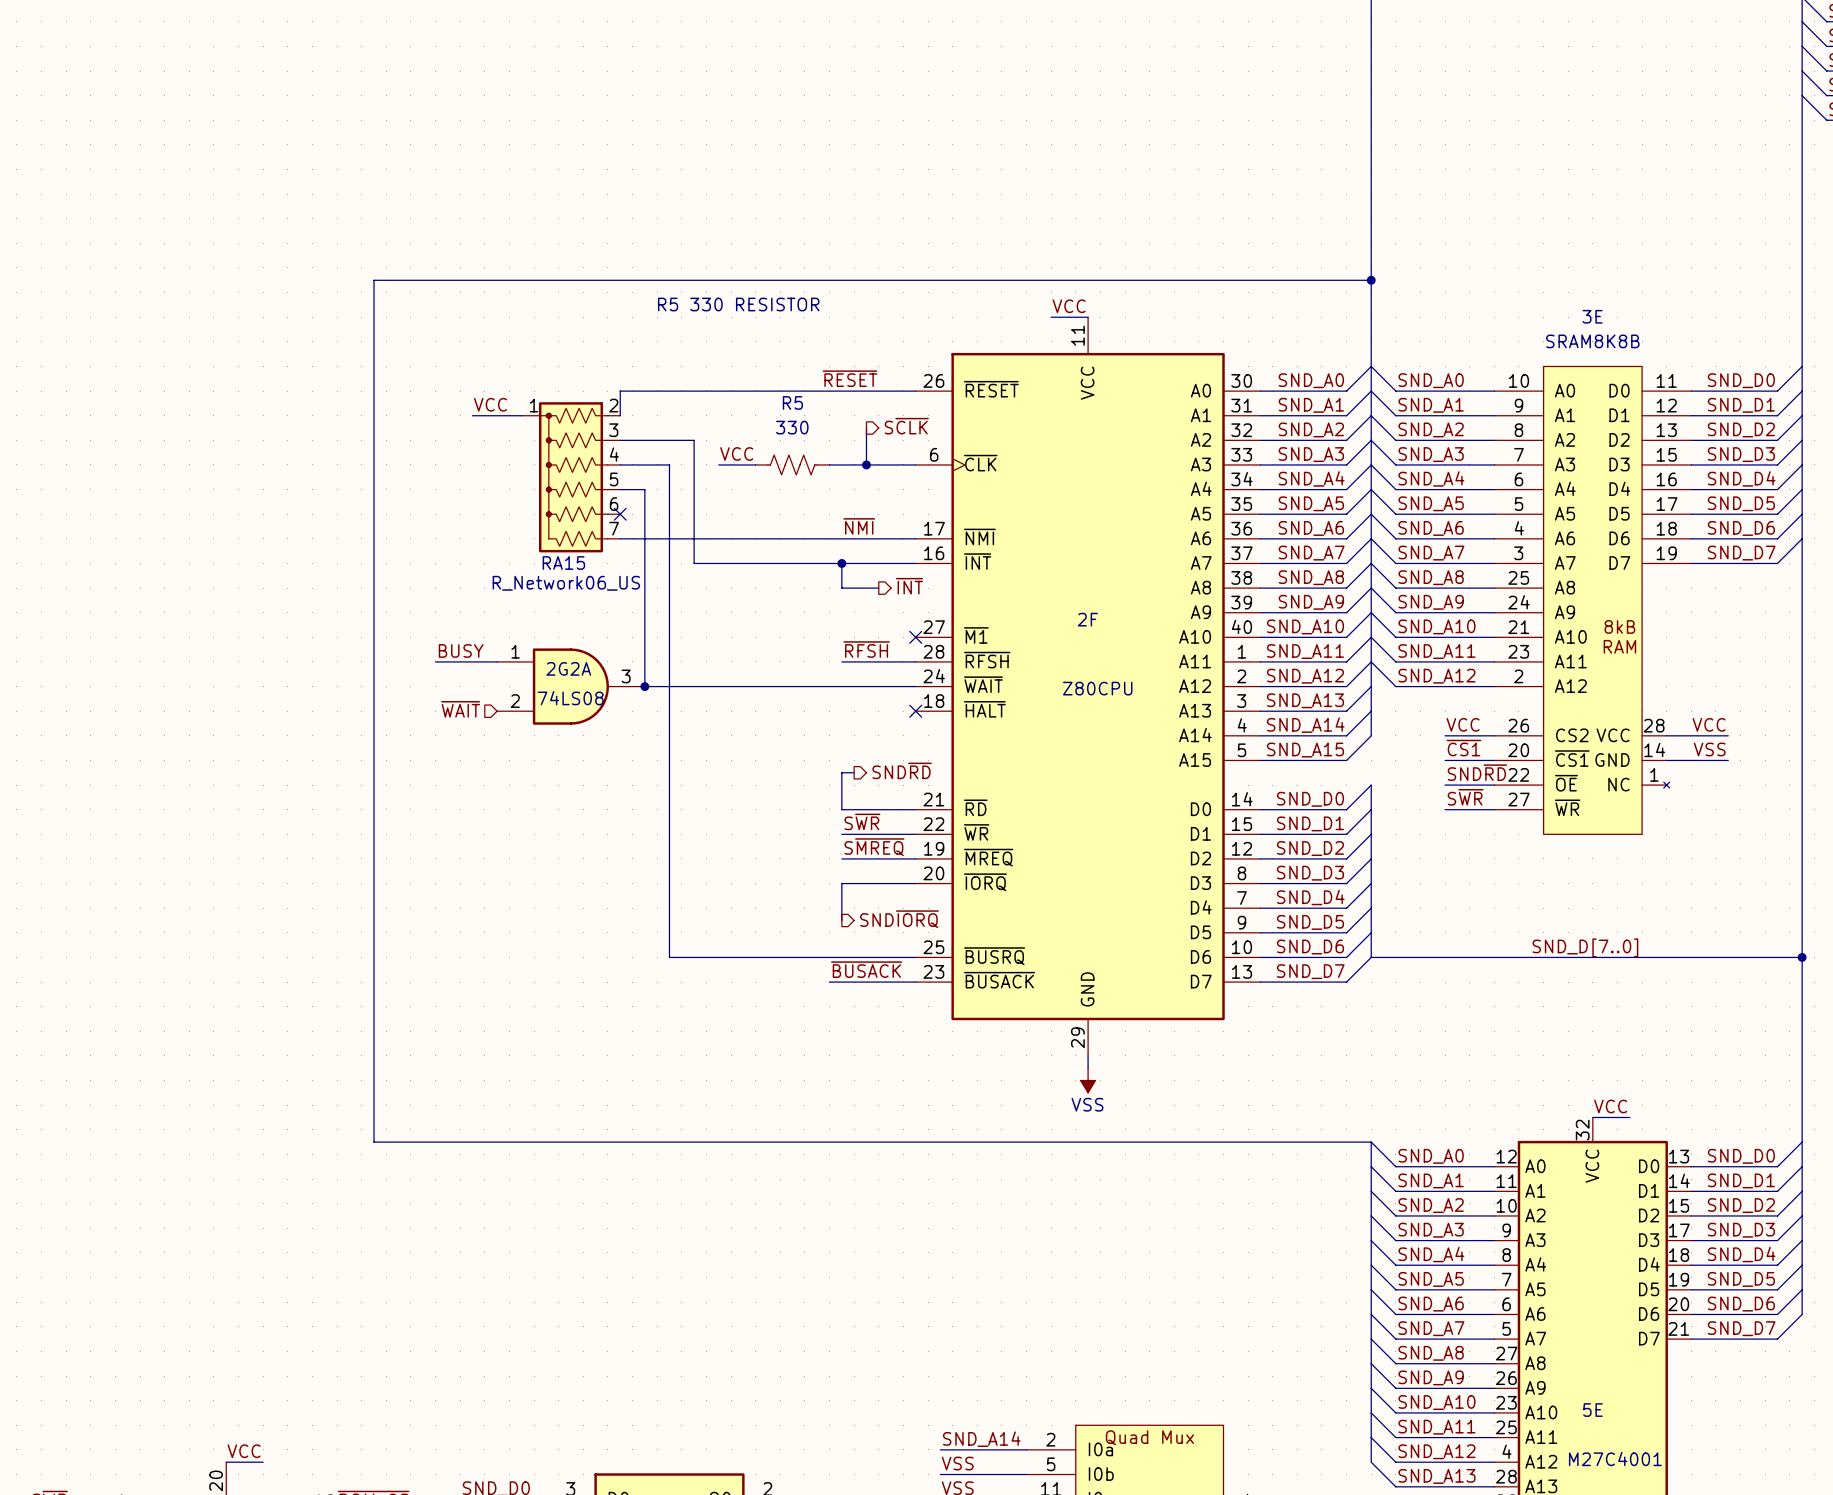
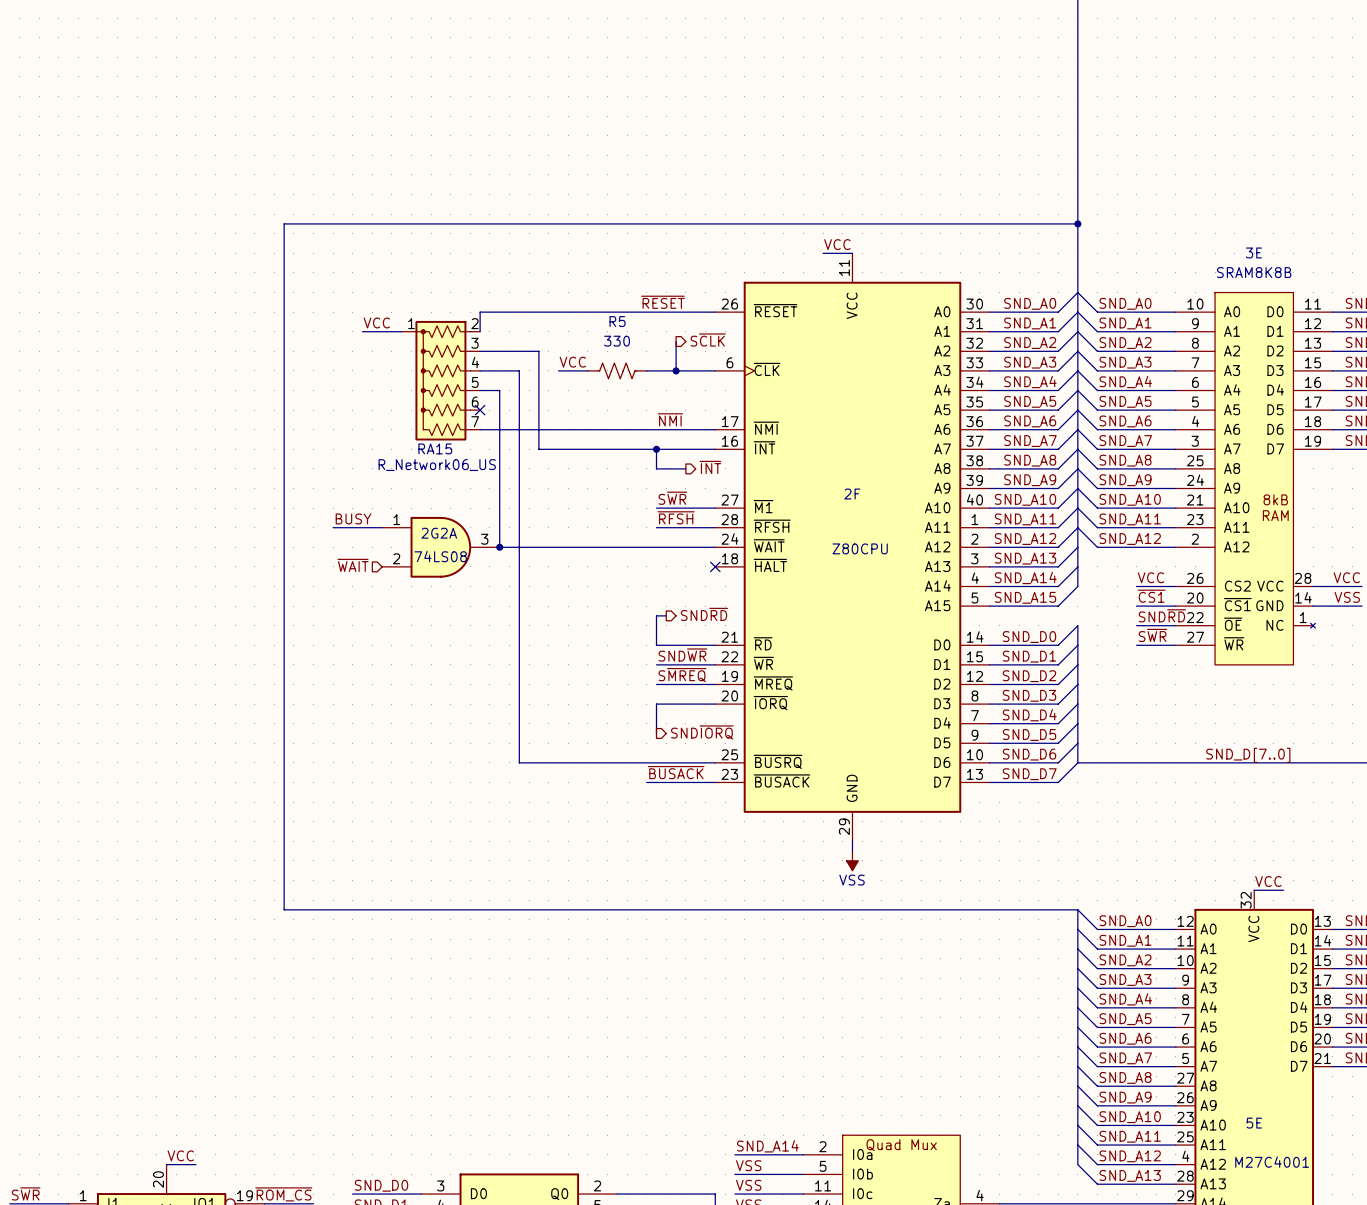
text: R5 330 RESISTOR (738, 304) -> none
label: none -> S~{WR} (672, 498)
wire: none -> (656, 508) (715, 508)
no-connect mark: (915, 637) -> none
label: S~{WR} (862, 821) -> SND~{WR} (682, 655)

